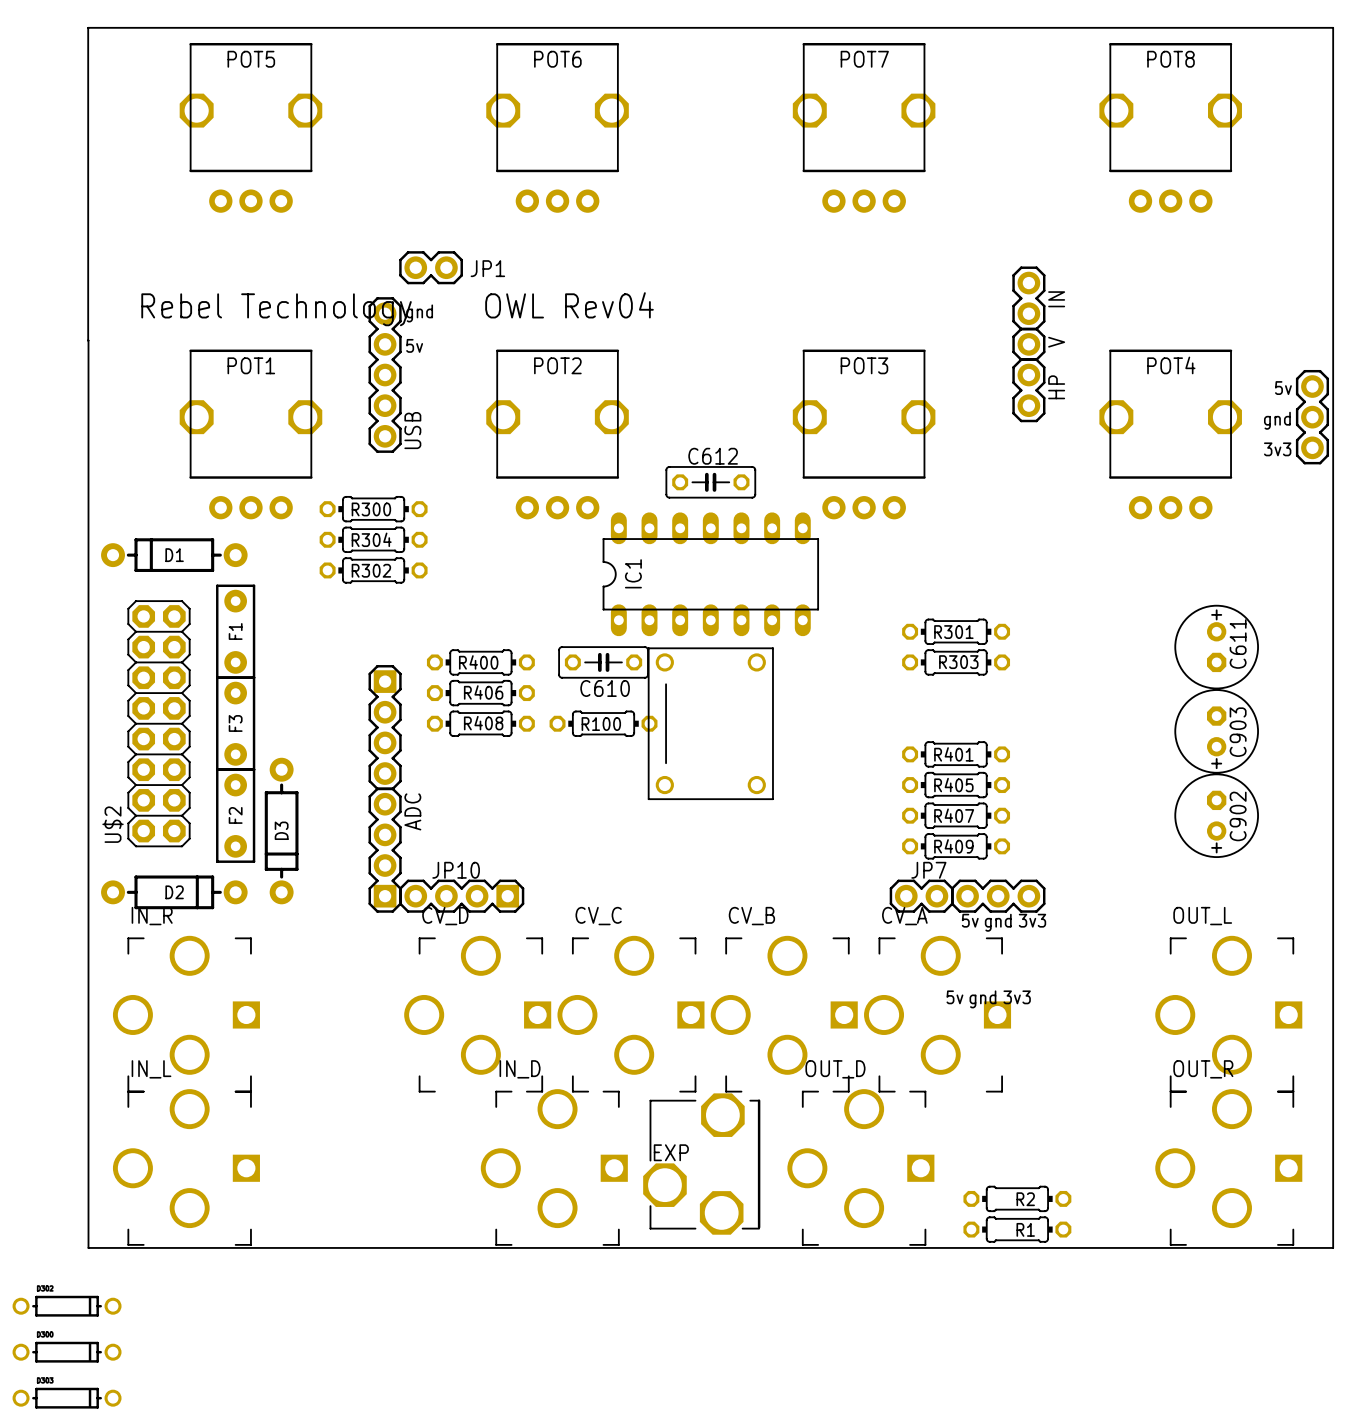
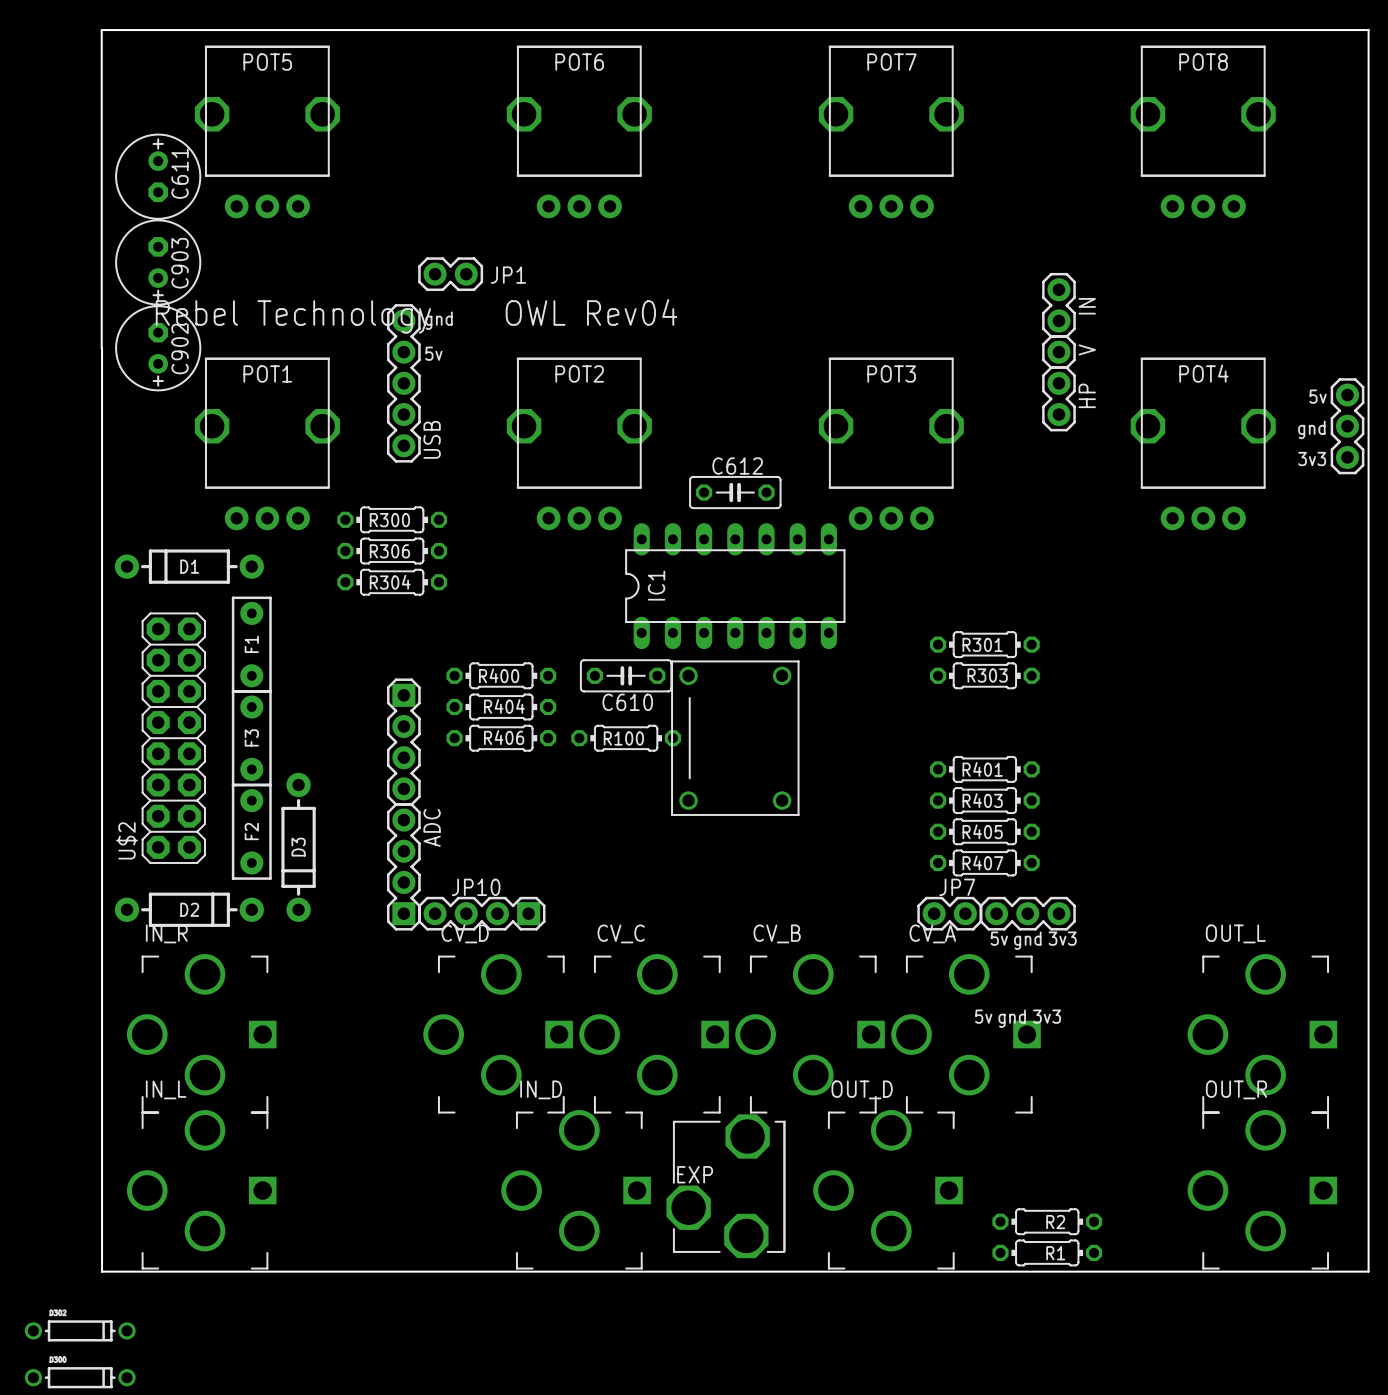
R304 name: R304 (371, 539) -> R306 (389, 551)
R302 name: R302 (371, 570) -> R304 (390, 582)
C611 position: (1216, 647) -> (158, 176)
R406 name: R406 (483, 692) -> R404 (504, 706)
R408 name: R408 (483, 723) -> R406 (504, 737)
C903 position: (1216, 731) -> (158, 262)
R405 name: R405 (953, 785) -> R403 (982, 800)
R407 name: R407 (954, 815) -> R405 (982, 831)
C902 position: (1216, 815) -> (158, 348)
R409 name: R409 (953, 846) -> R407 (982, 862)

